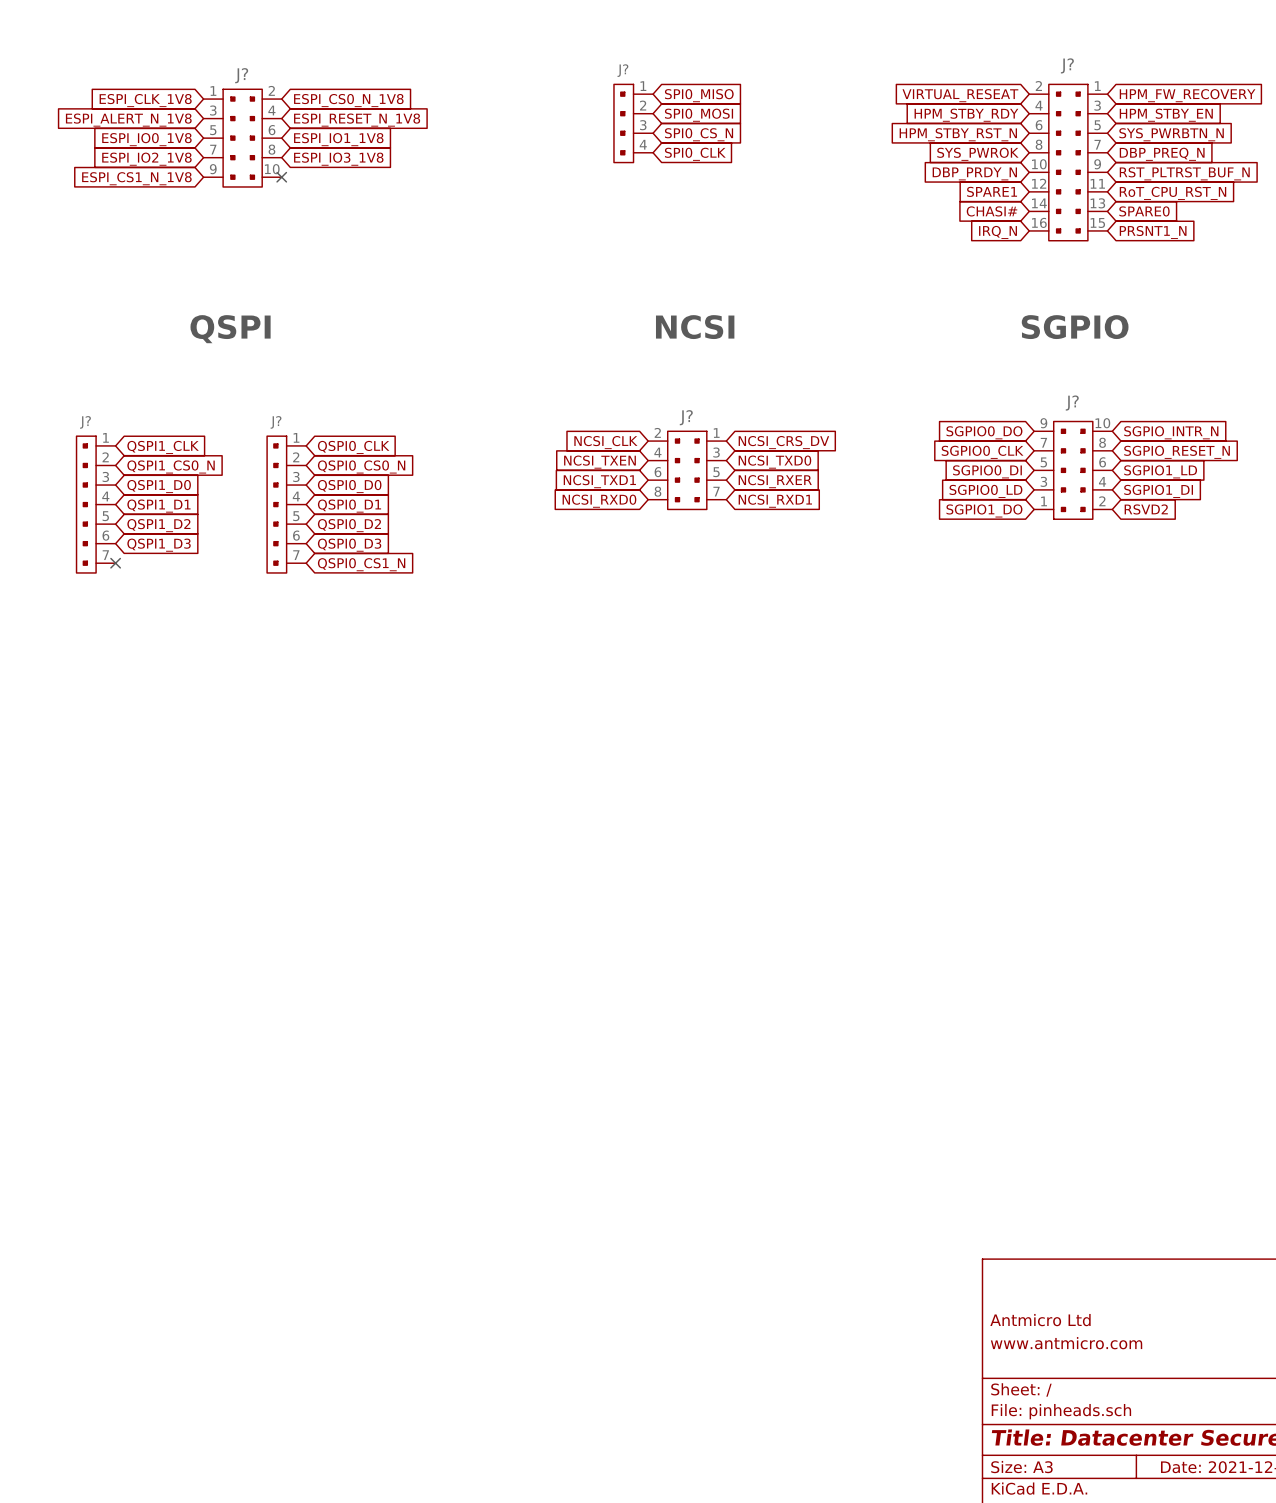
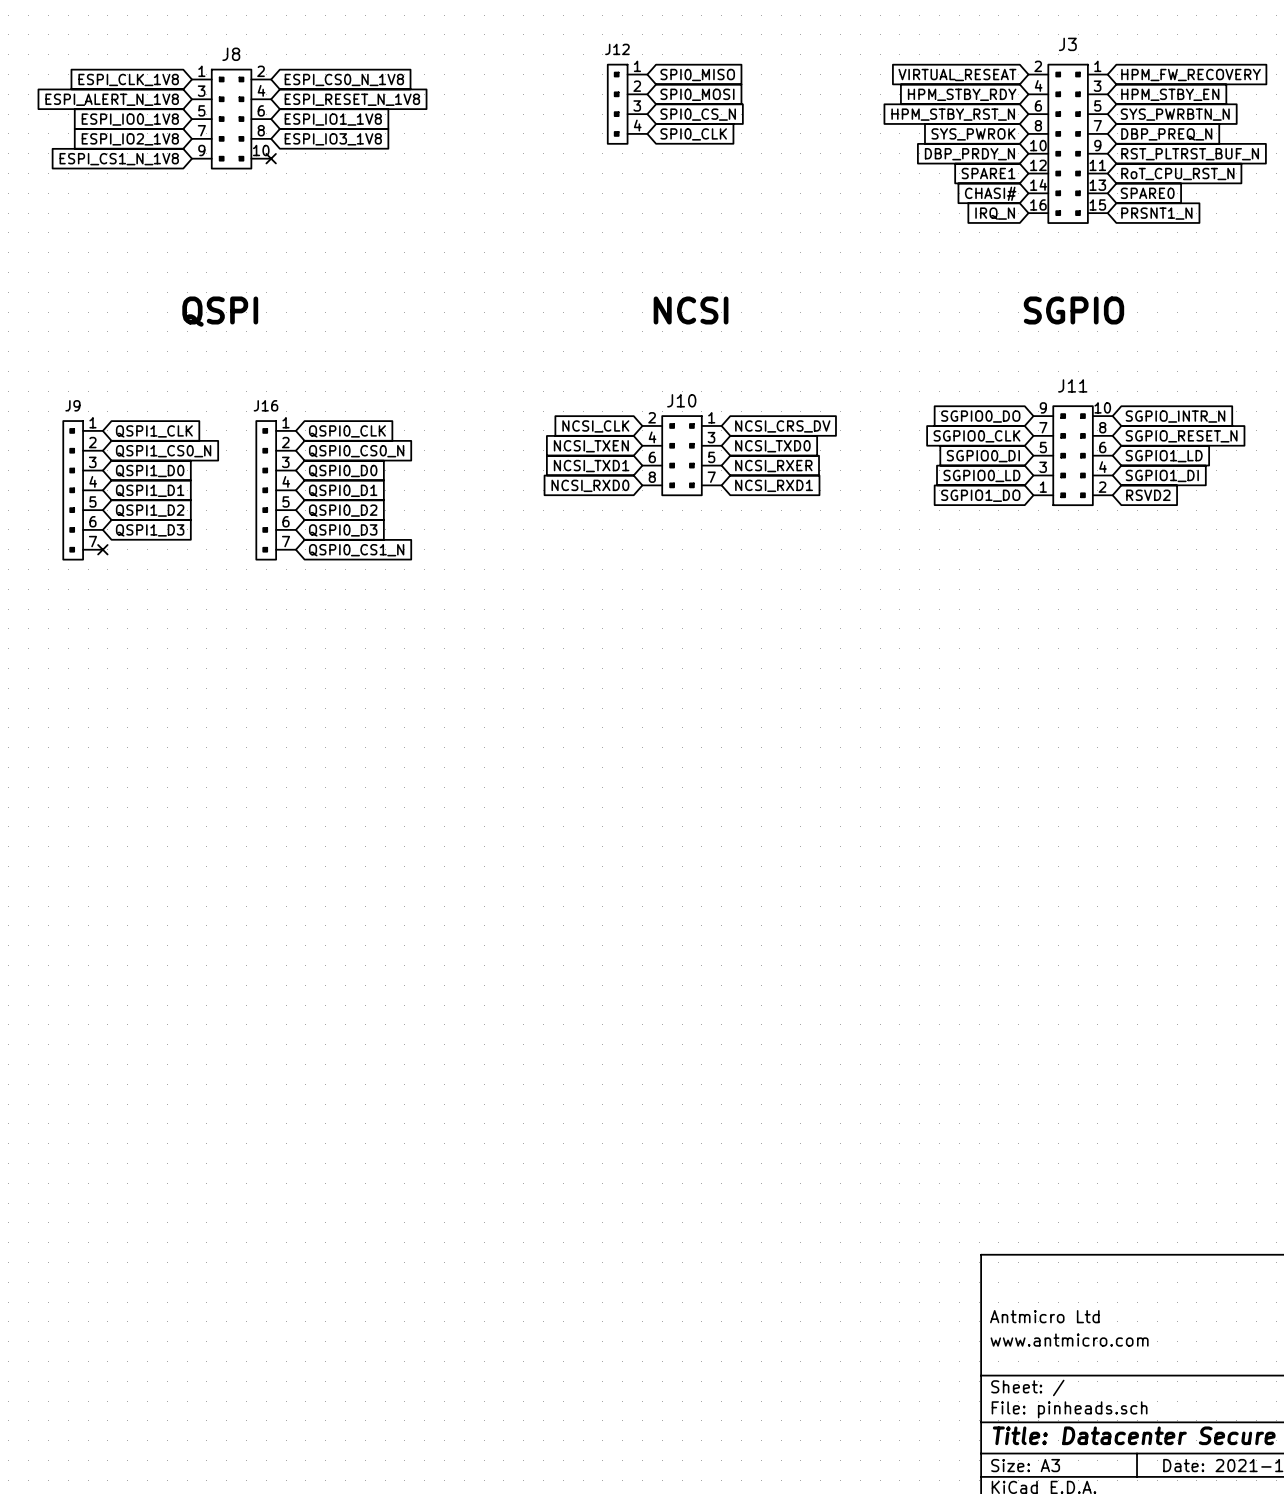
J? name: J? (1067, 65) -> J3 (1067, 44)
J? name: J? (622, 70) -> J12 (617, 49)
J? name: J? (241, 75) -> J8 (231, 54)
J? name: J? (1072, 403) -> J11 (1072, 385)
J? name: J? (686, 417) -> J10 (681, 400)
J? name: J? (85, 422) -> J9 (72, 405)
J? name: J? (276, 422) -> J16 (265, 405)

